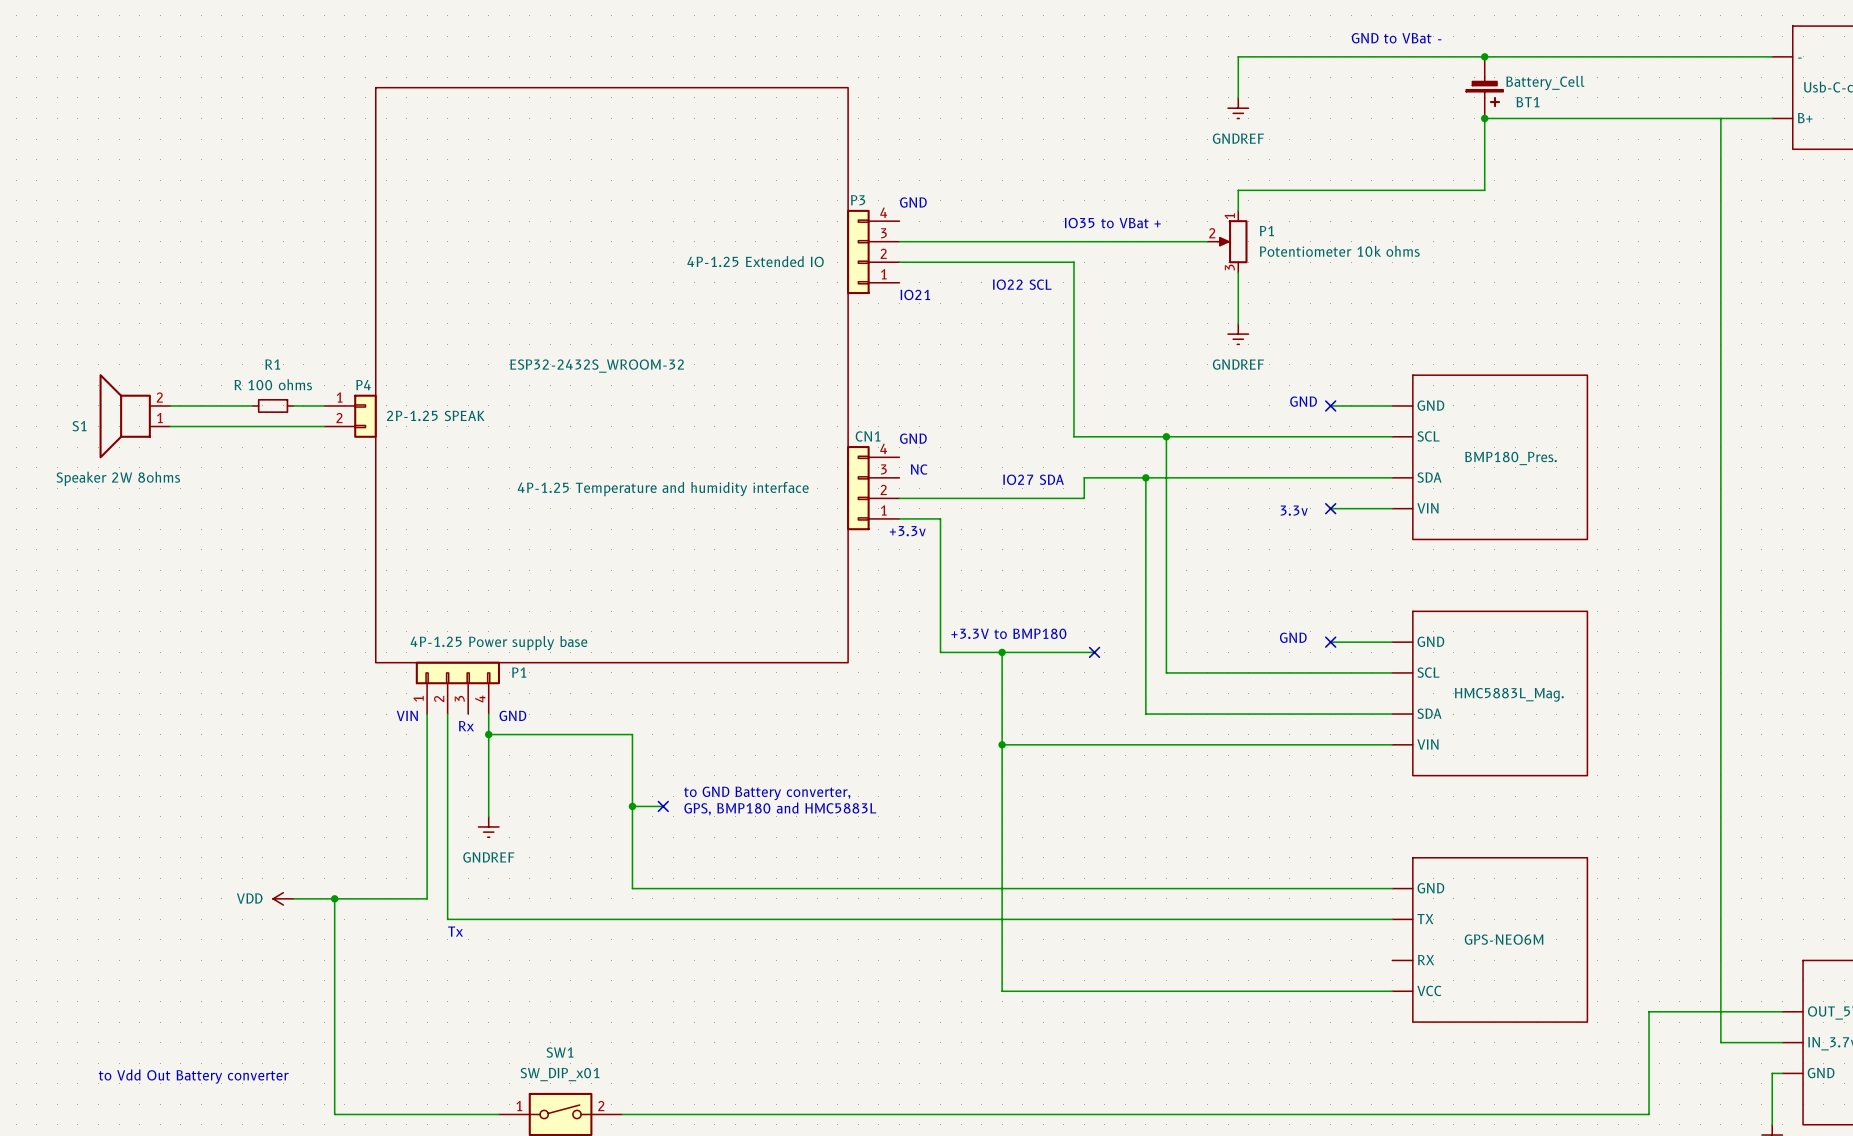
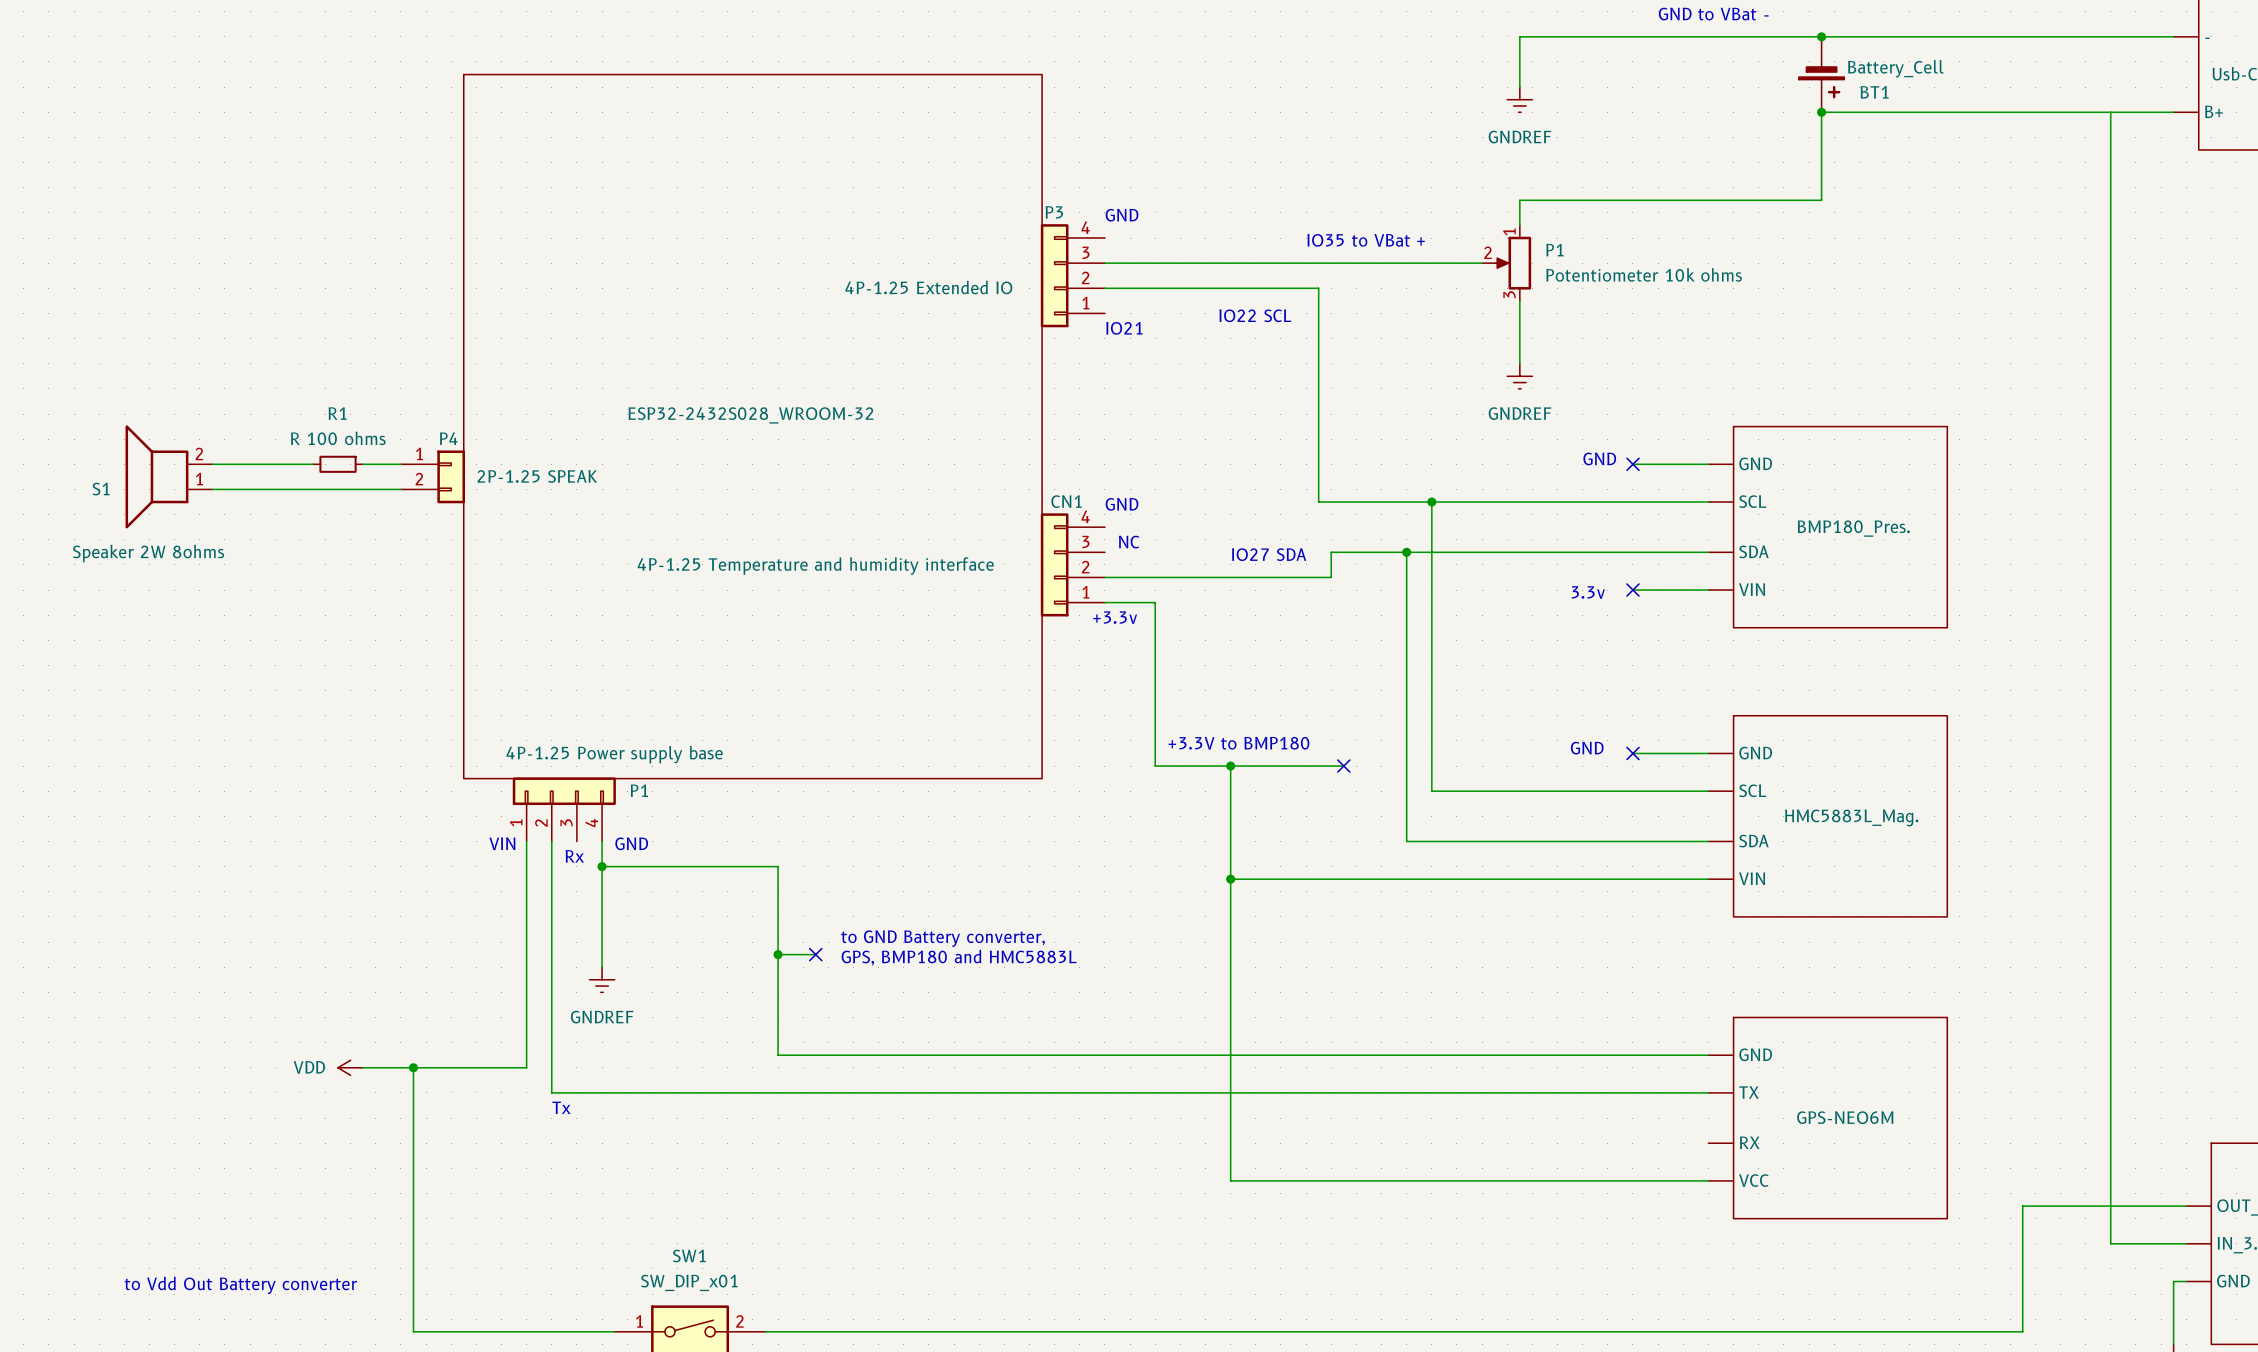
ESP32-2432S_WROOM-32 name: ESP32-2432S_WROOM-32 (597, 366) -> ESP32-2432S028_WROOM-32 (750, 415)

